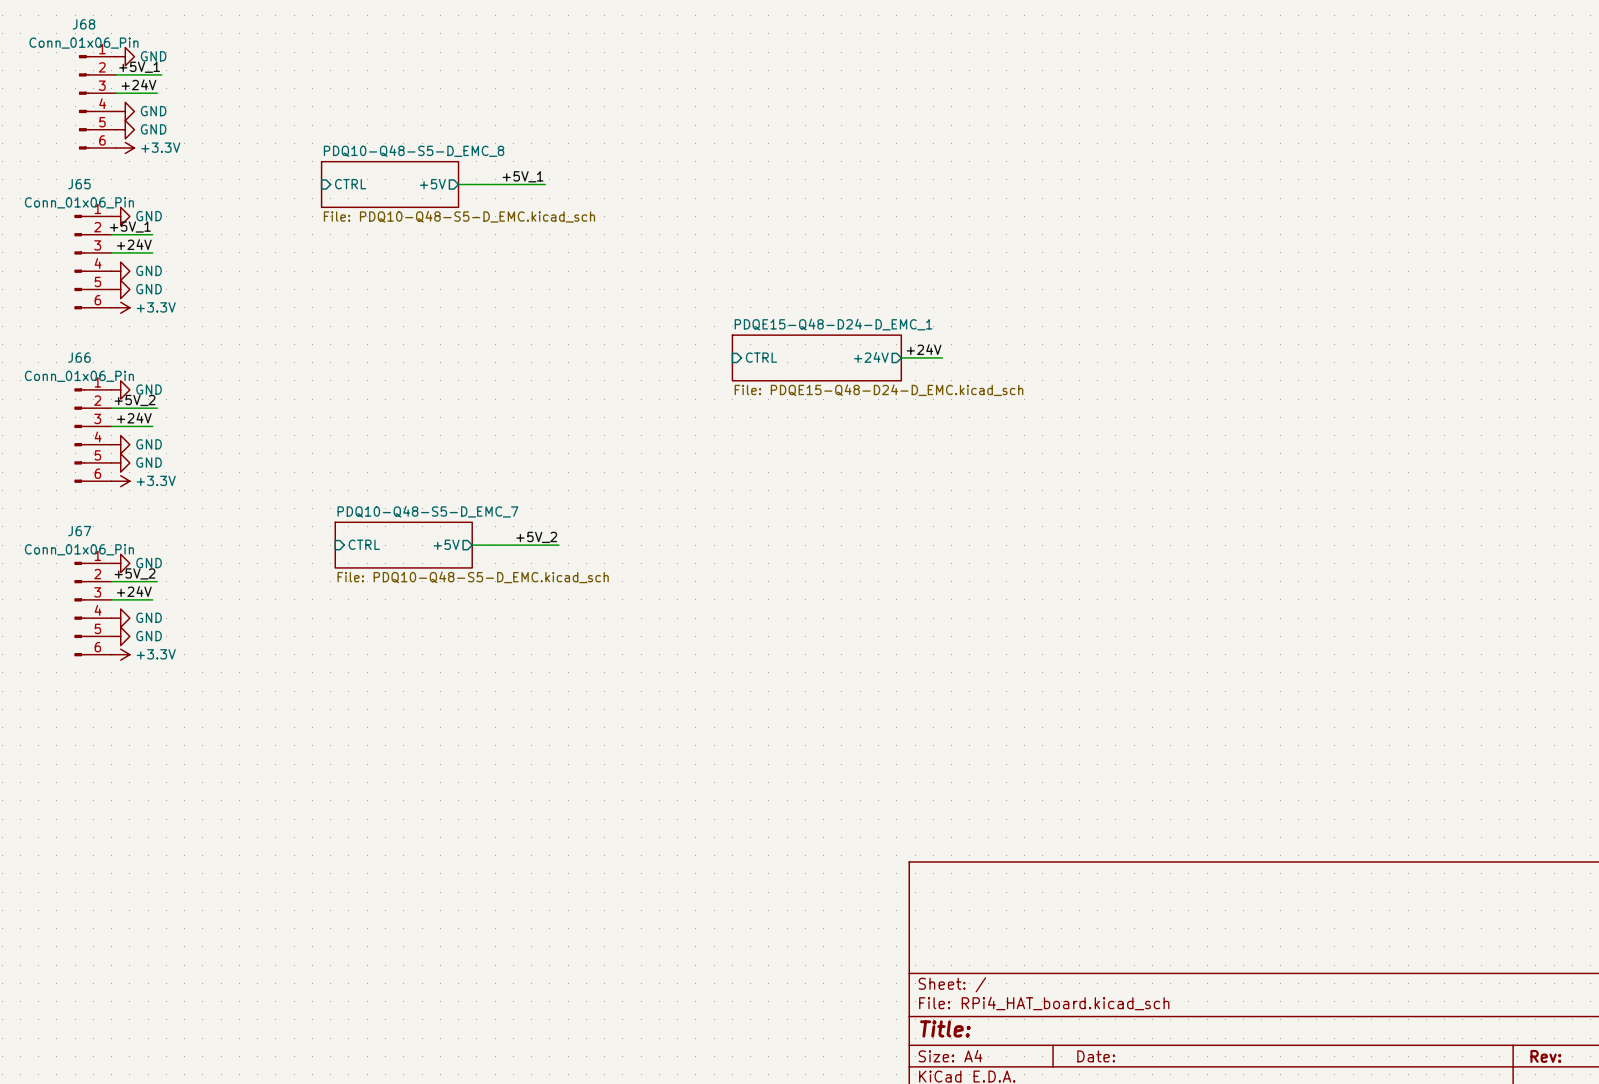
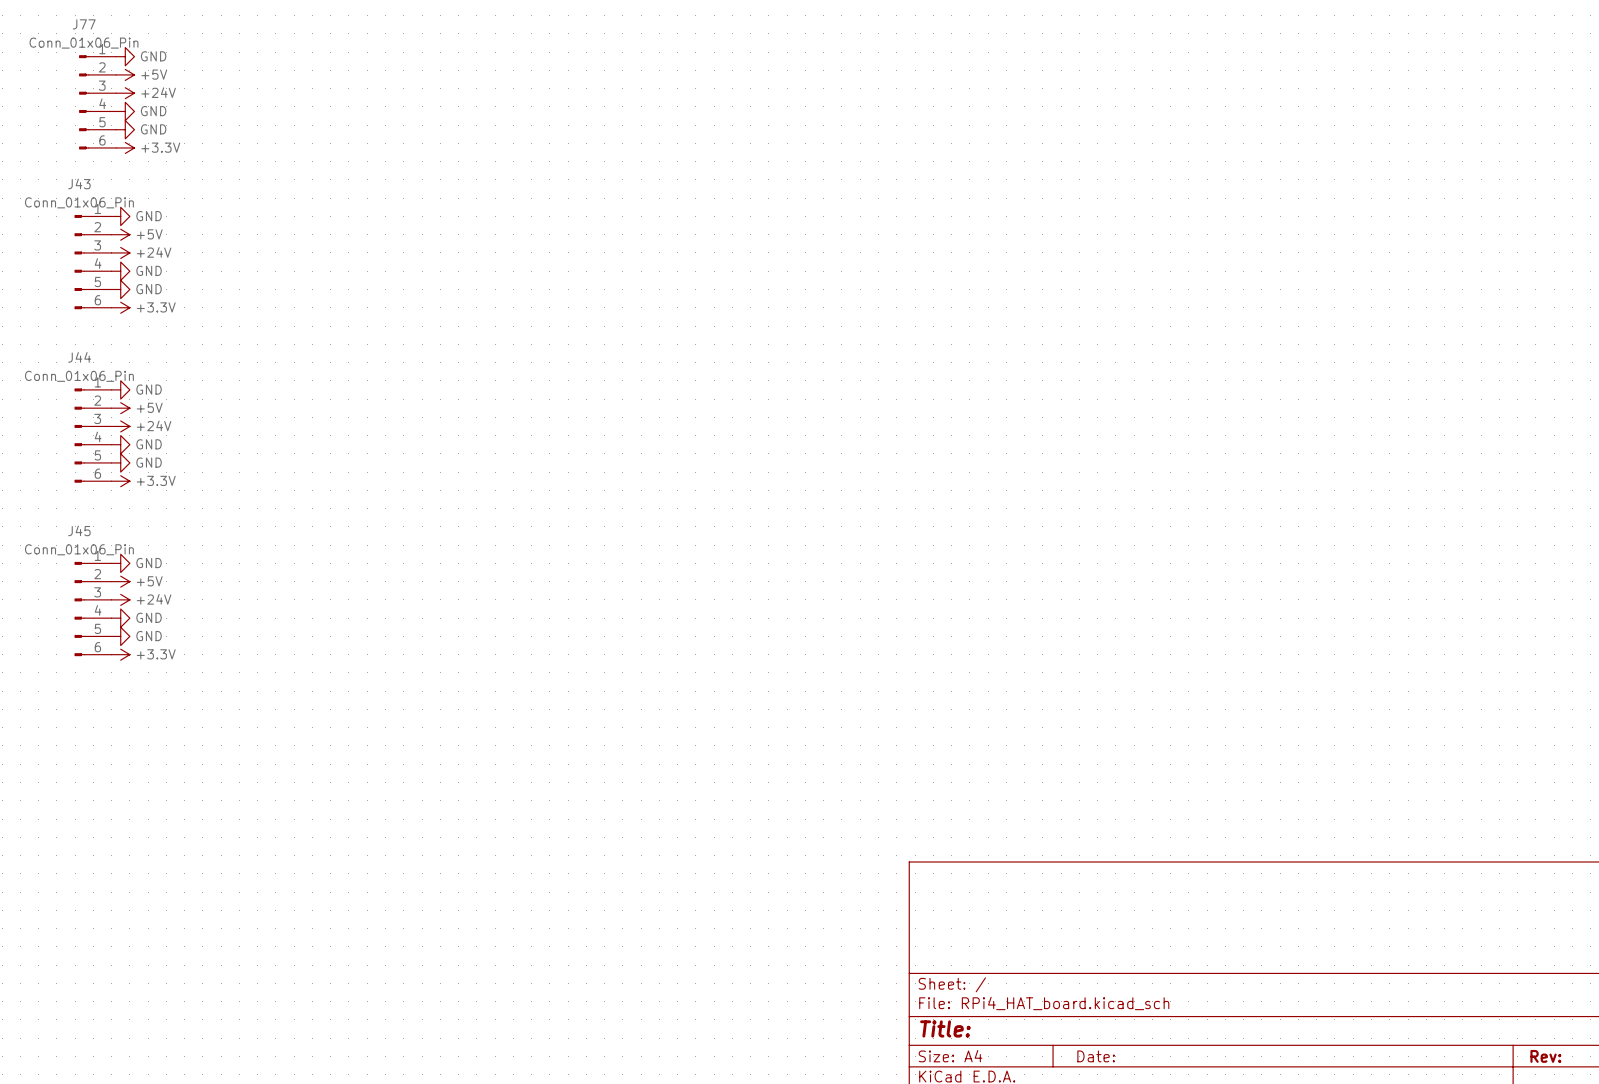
J68 name: J68 (83, 24) -> J77 (84, 24)
label: +5V_1 (139, 67) -> none
power symbol: none -> +5V (125, 74)
label: +24V (138, 84) -> none
power symbol: none -> +24V (125, 93)
label: +5V_1 (523, 176) -> none
J65 name: J65 (79, 184) -> J43 (79, 183)
sheet pin: CTRL (350, 184) -> none
sheet PDQ10-Q48-S5-D_EMC_8: File: PDQ10-Q48-S5-D_EMC.kicad_sch (390, 184) -> none
sheet pin: +5V (432, 184) -> none
wire: (458, 184) (545, 184) -> none
label: +5V_1 (130, 227) -> none
power symbol: none -> +5V (120, 234)
label: +24V (134, 244) -> none
power symbol: none -> +24V (120, 252)
label: +24V (924, 349) -> none
J66 name: J66 (79, 357) -> J44 (79, 357)
sheet pin: CTRL (761, 357) -> none
sheet PDQE15-Q48-D24-D_EMC_1: File: PDQE15-Q48-D24-D_EMC.kicad_sch (816, 357) -> none
sheet pin: +24V (871, 357) -> none
wire: (901, 357) (942, 357) -> none
label: +5V_2 (135, 400) -> none
power symbol: none -> +5V (120, 408)
label: +24V (134, 418) -> none
power symbol: none -> +24V (120, 426)
J67 name: J67 (79, 531) -> J45 (79, 530)
label: +5V_2 (536, 537) -> none
sheet pin: CTRL (364, 544) -> none
sheet pin: +5V (446, 544) -> none
sheet PDQ10-Q48-S5-D_EMC_7: File: PDQ10-Q48-S5-D_EMC.kicad_sch (403, 545) -> none
wire: (472, 545) (558, 545) -> none
label: +5V_2 (135, 573) -> none
power symbol: none -> +5V (120, 581)
label: +24V (134, 591) -> none
power symbol: none -> +24V (120, 599)

